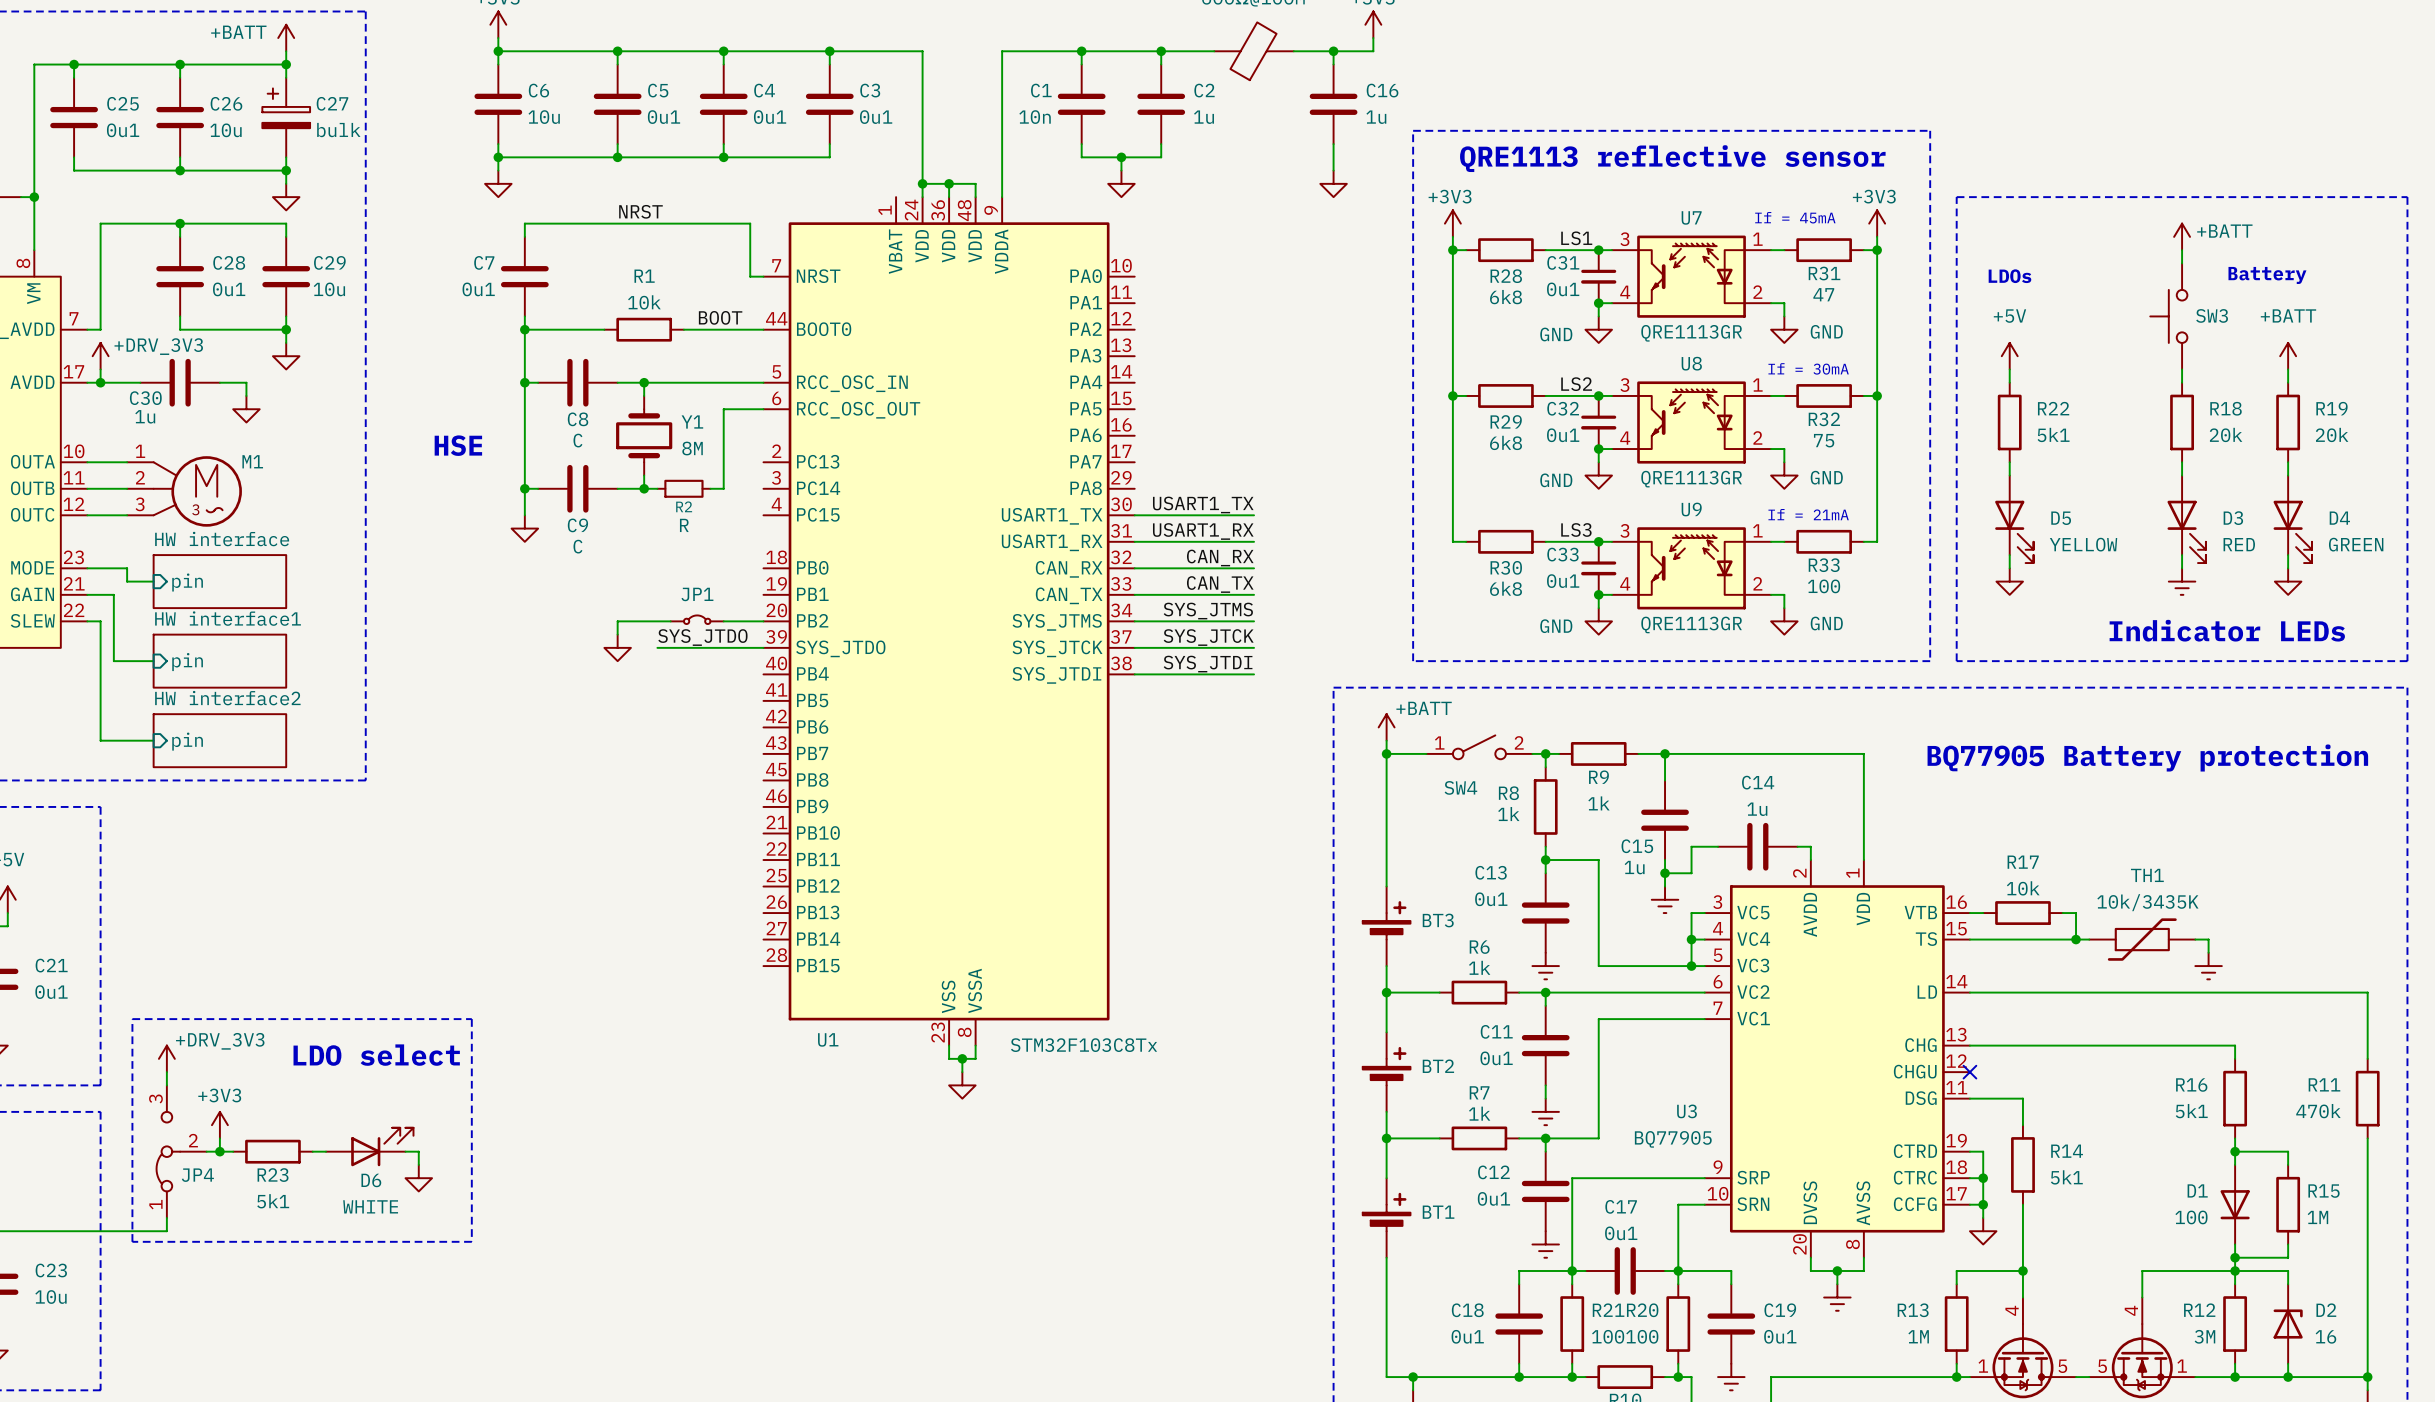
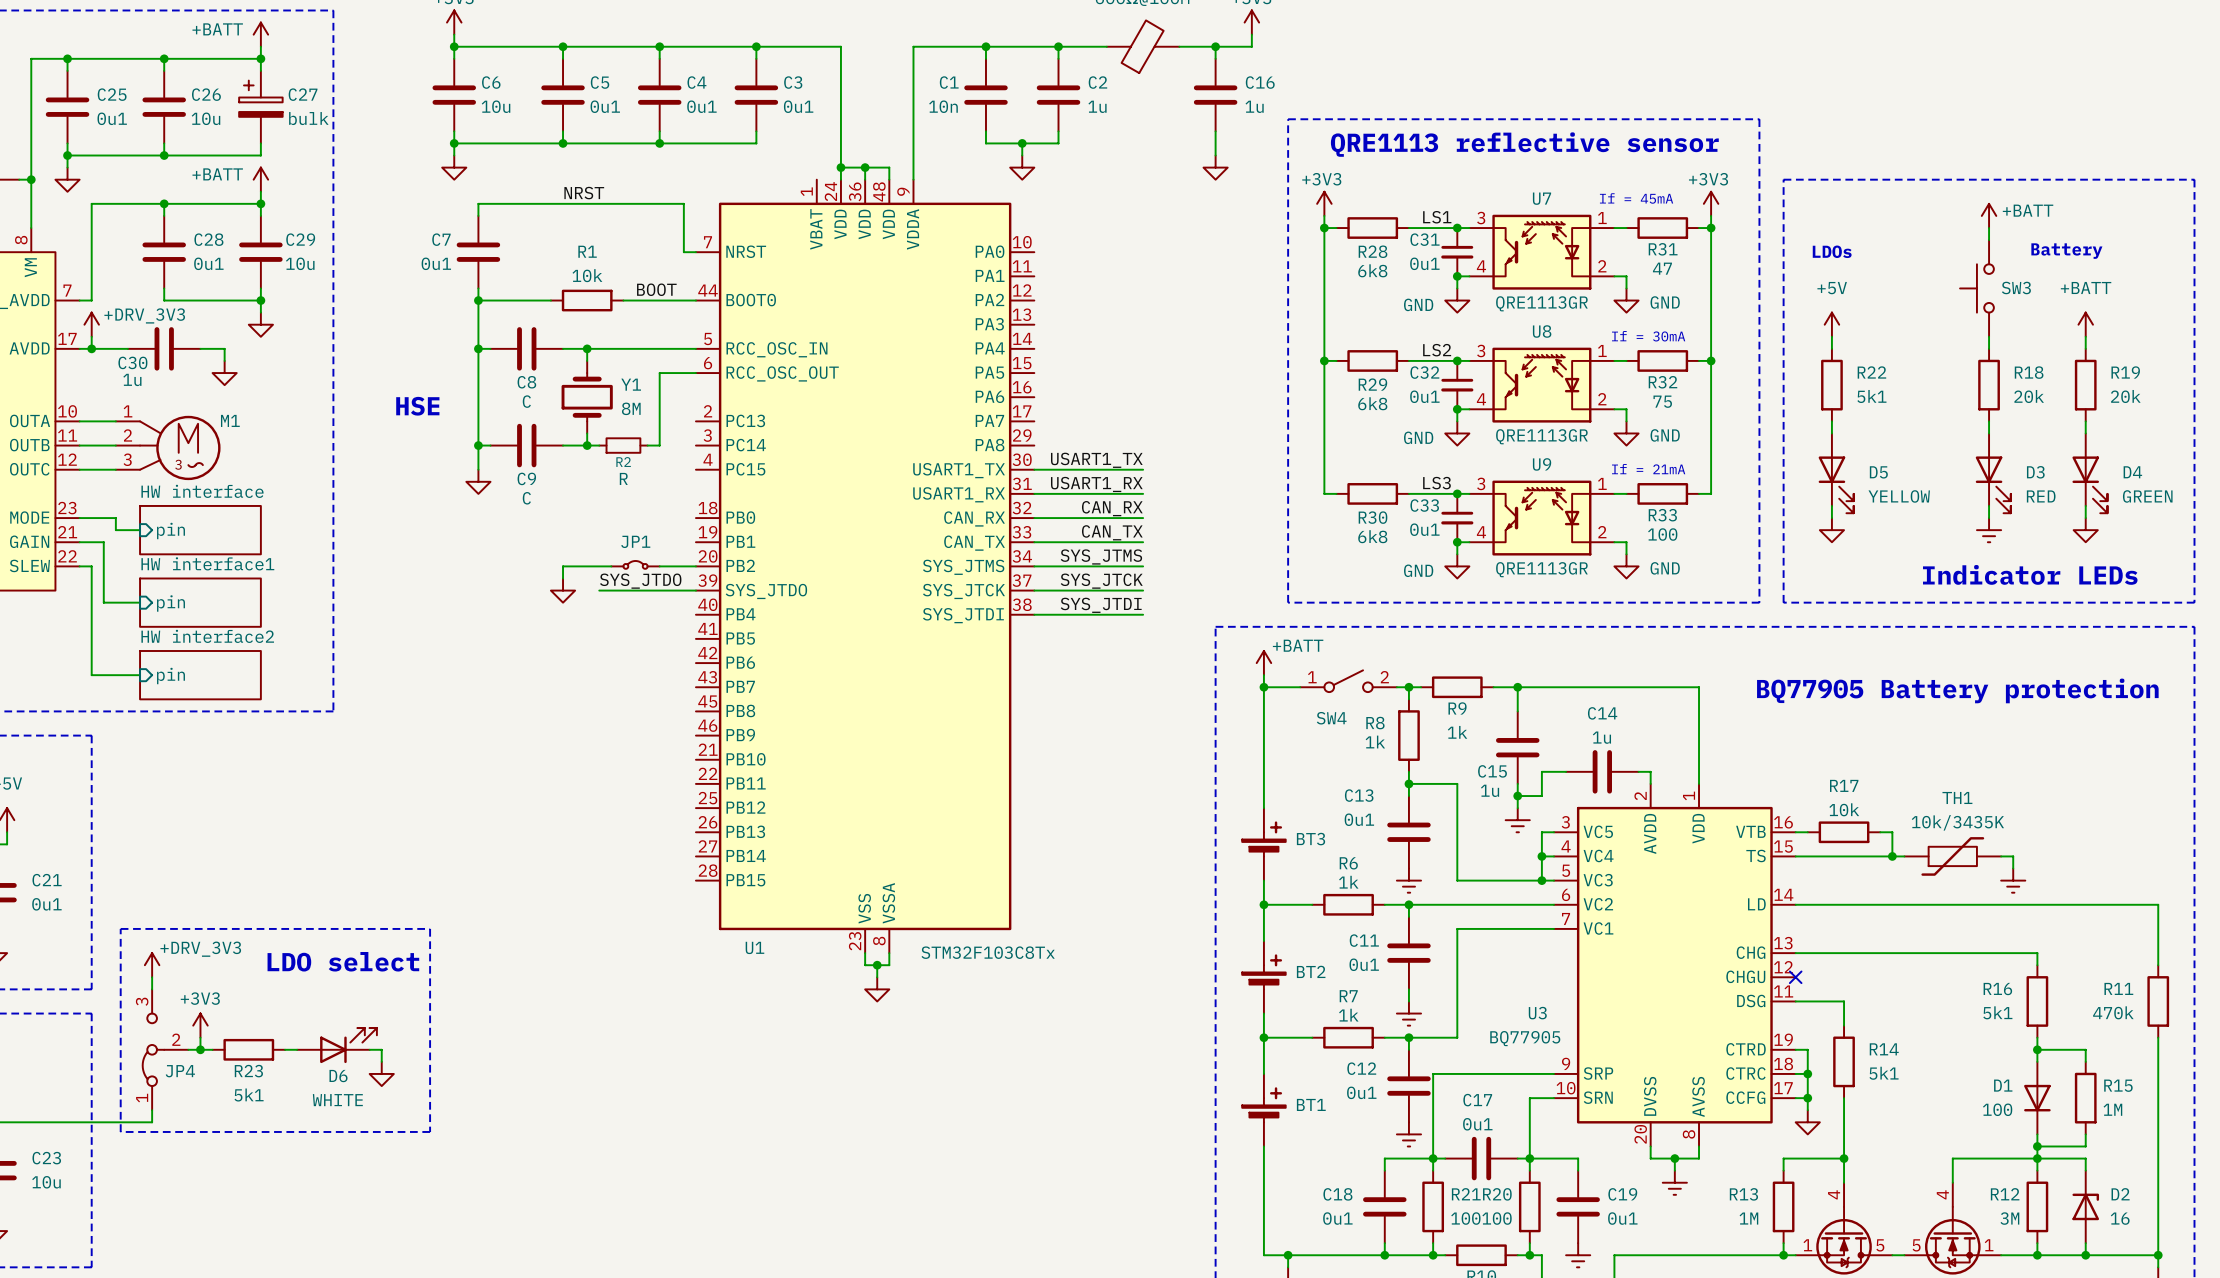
wire: none -> (67, 155) (67, 167)
junction: none -> (67, 155)
wire: (286, 170) (286, 183) -> (260, 191) (260, 203)
junction position: (286, 170) -> (260, 203)
power symbol shape: [272, 183, 300, 211] -> [253, 167, 269, 192]
power symbol text: none -> +BATT (217, 174)
power symbol: none -> (67, 179)

